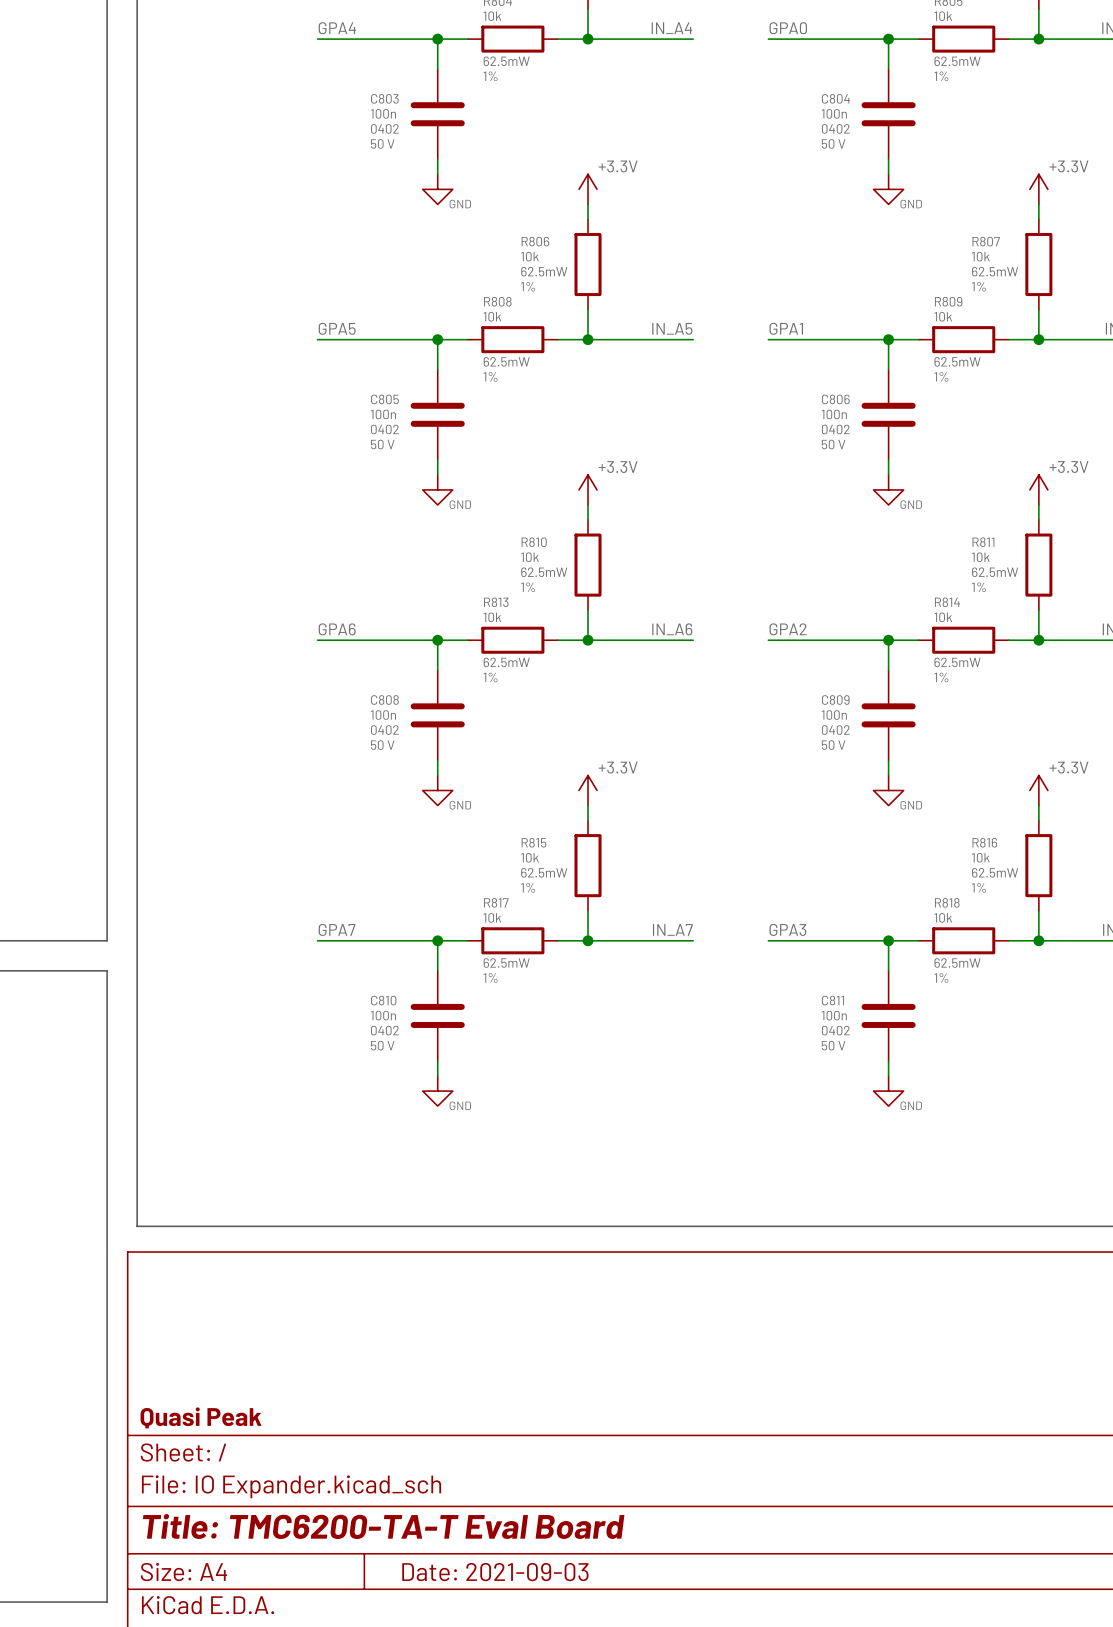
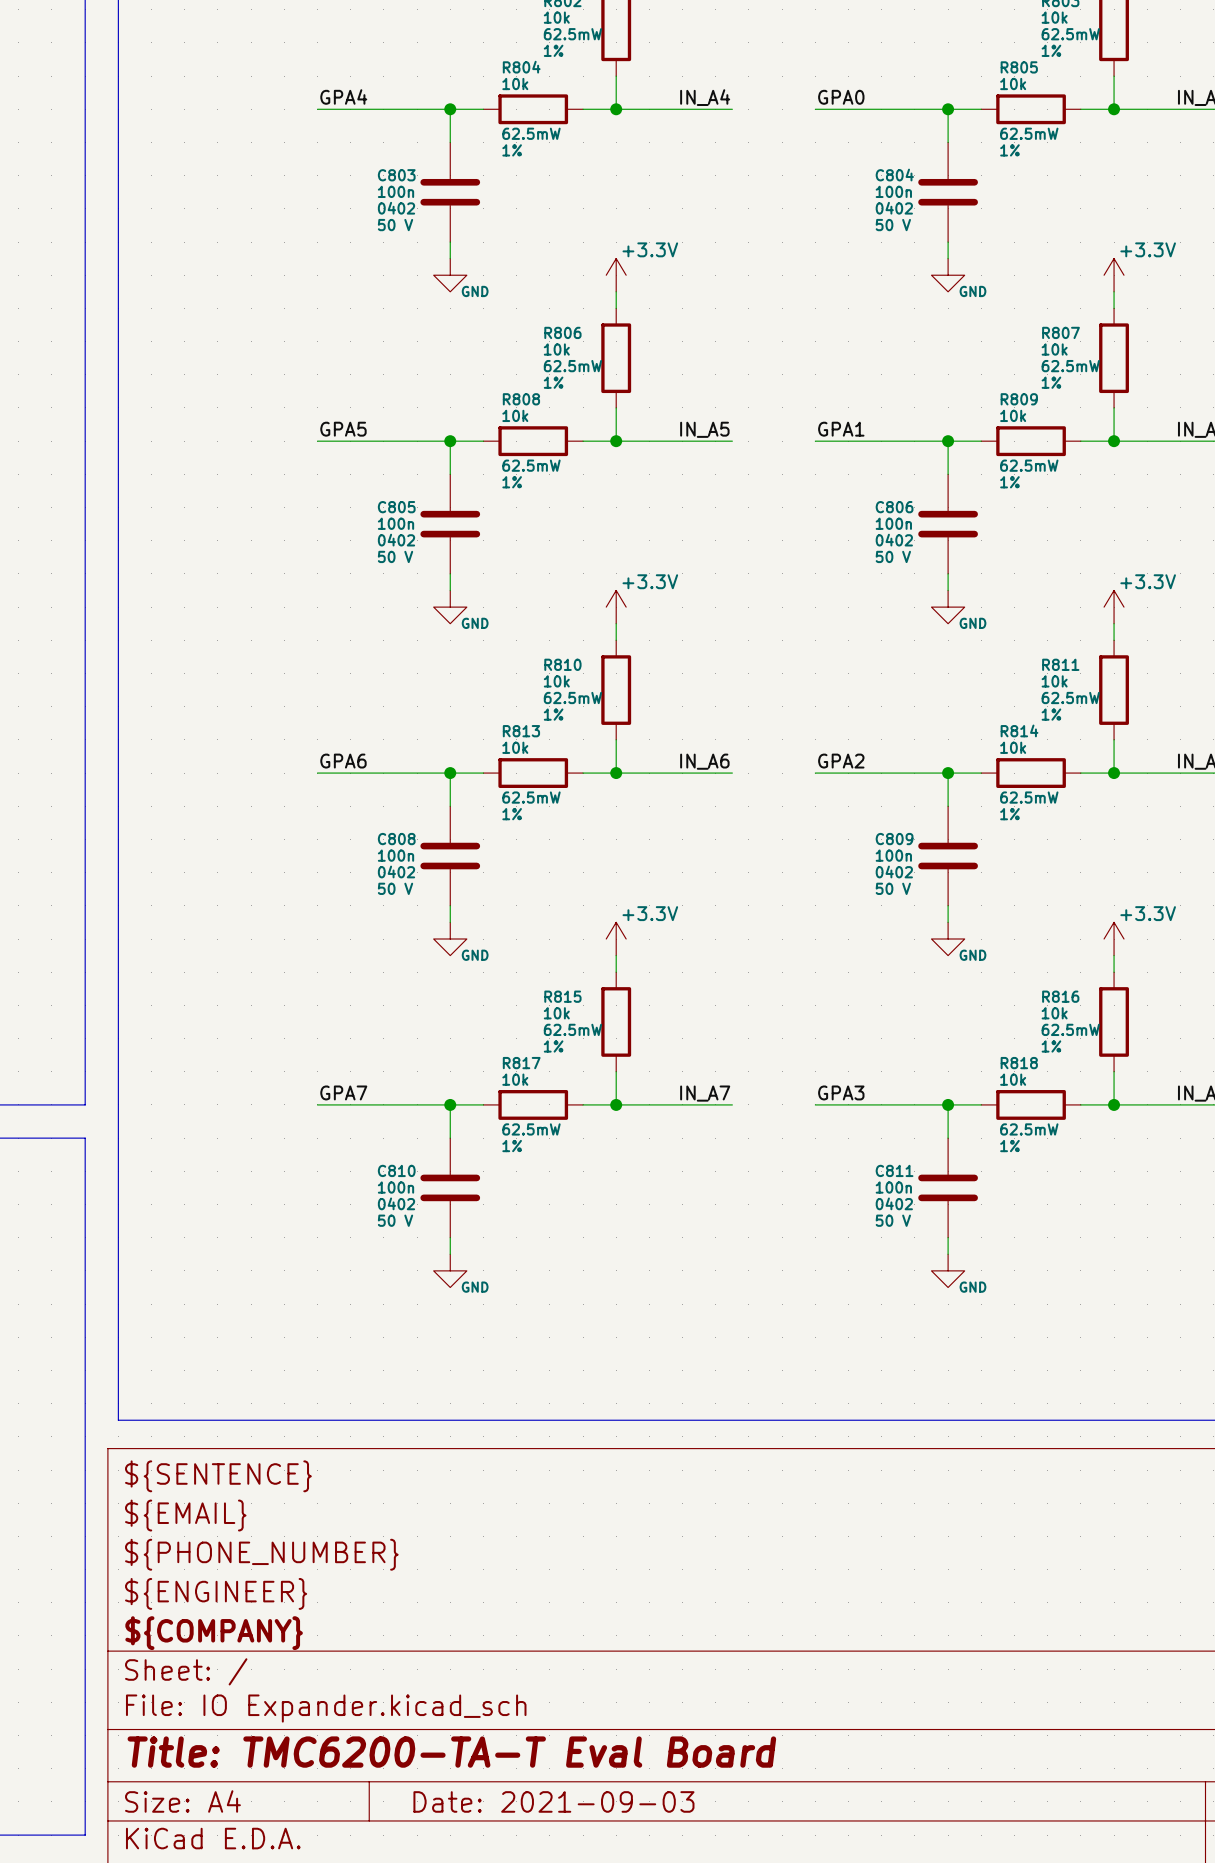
title block: none -> ${SENTENCE} (218, 1476)
title block: none -> ${EMAIL} (185, 1515)
title block: none -> ${PHONE_NUMBER} (261, 1554)
title block: none -> ${ENGINEER} (216, 1593)
title block: Quasi Peak (200, 1417) -> ${COMPANY} (214, 1633)

